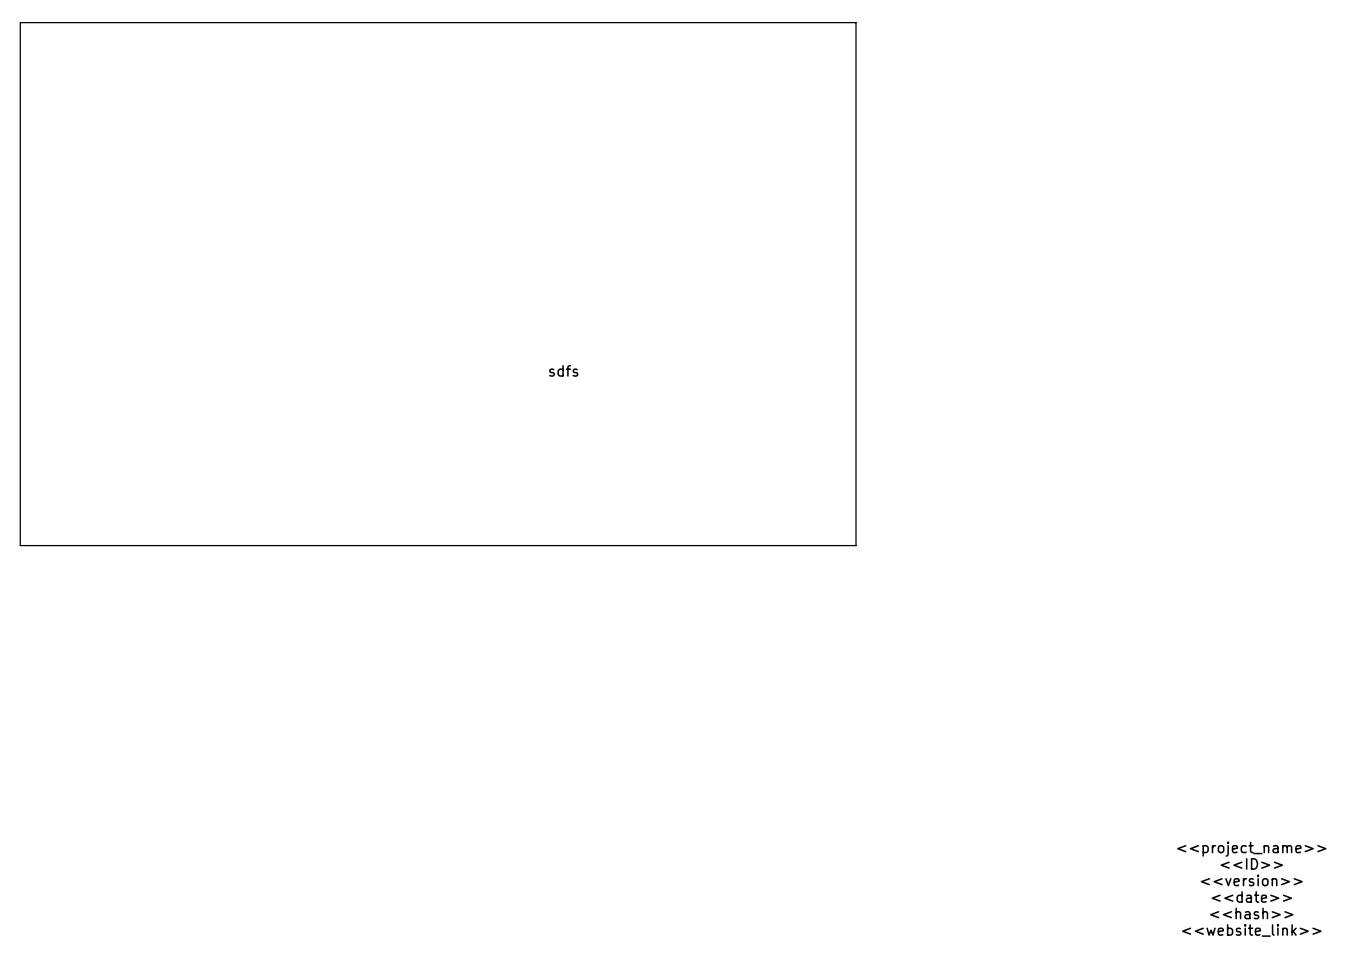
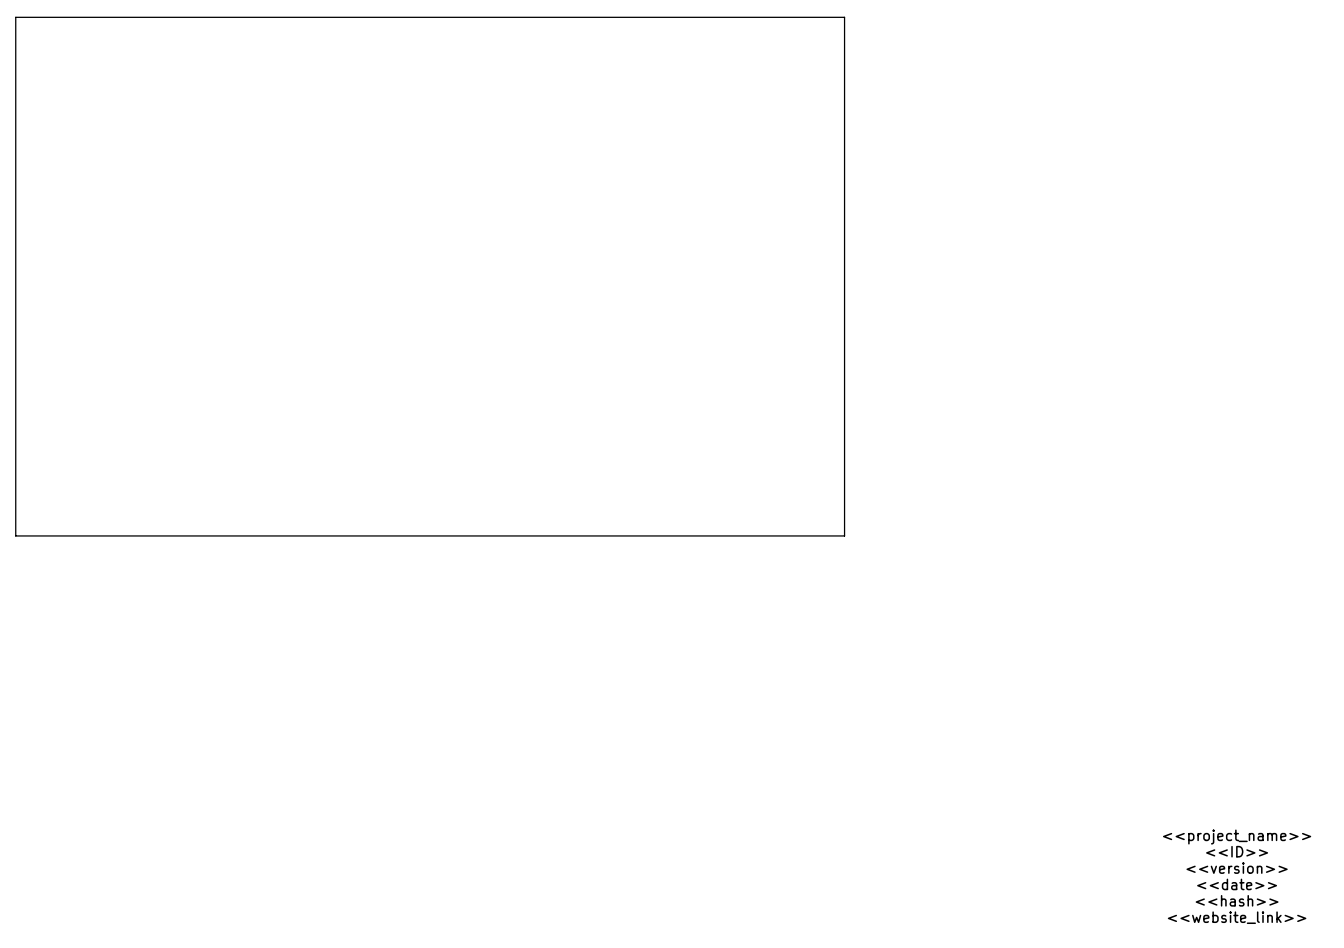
text: sdfs (563, 370) -> none

